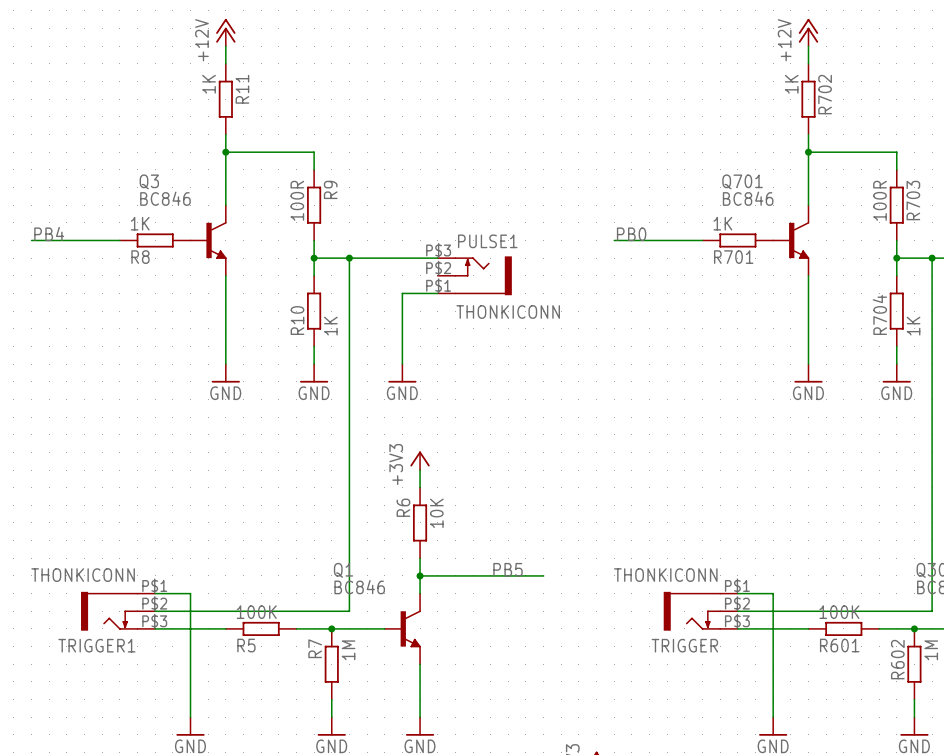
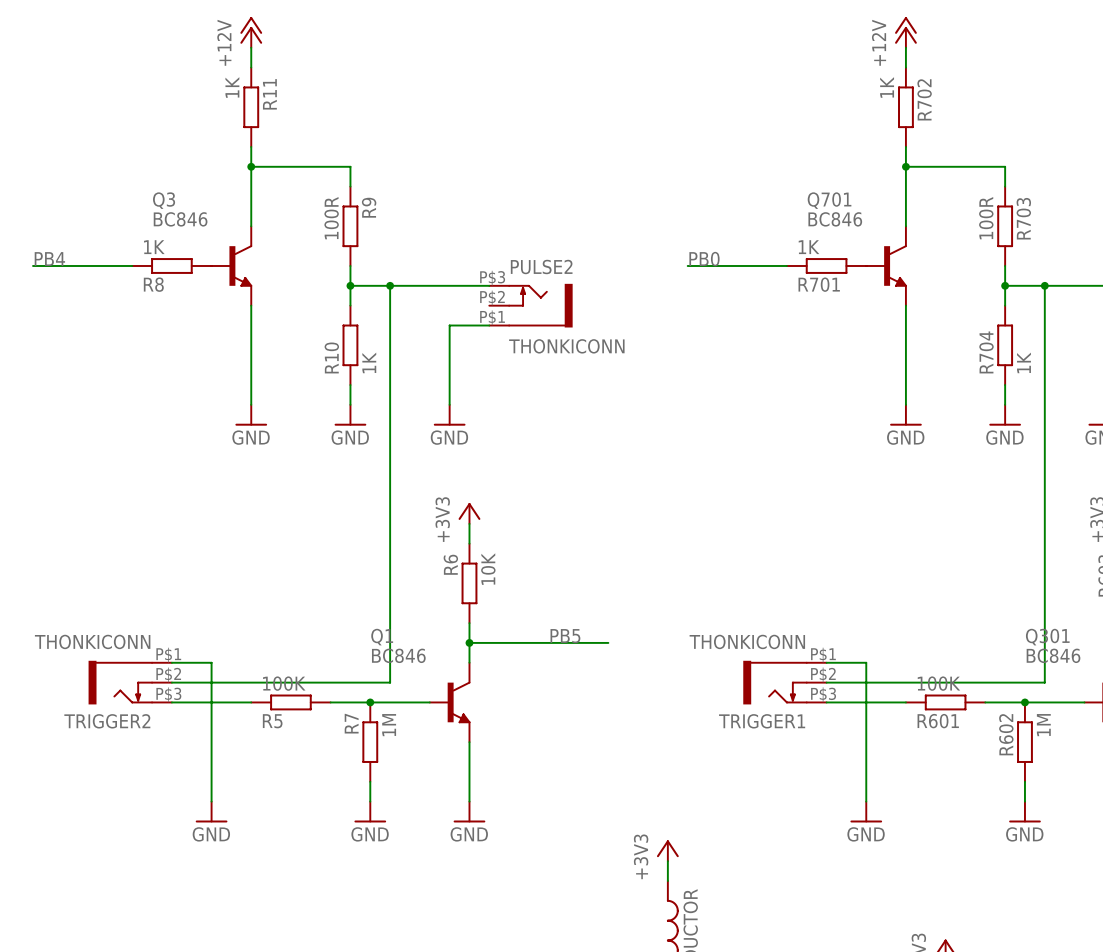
PULSE1 name: PULSE1 (487, 241) -> PULSE2 (541, 266)
TRIGGER1 name: TRIGGER1 (96, 645) -> TRIGGER2 (107, 721)
TRIGGER name: TRIGGER (684, 645) -> TRIGGER1 (762, 721)

